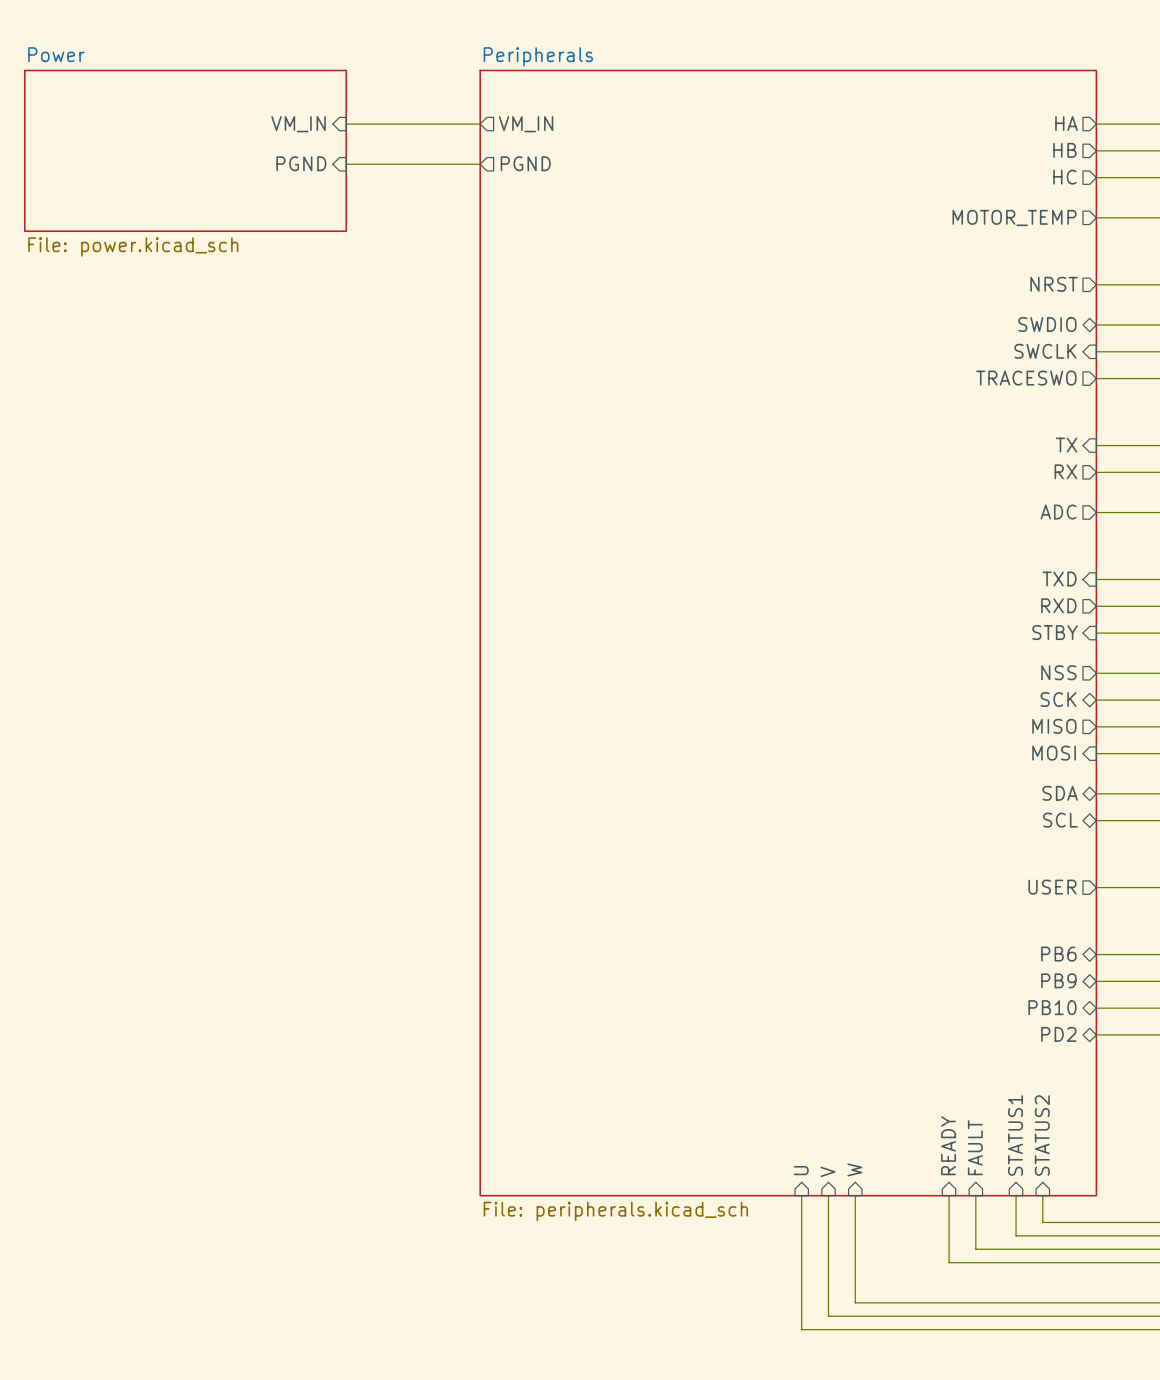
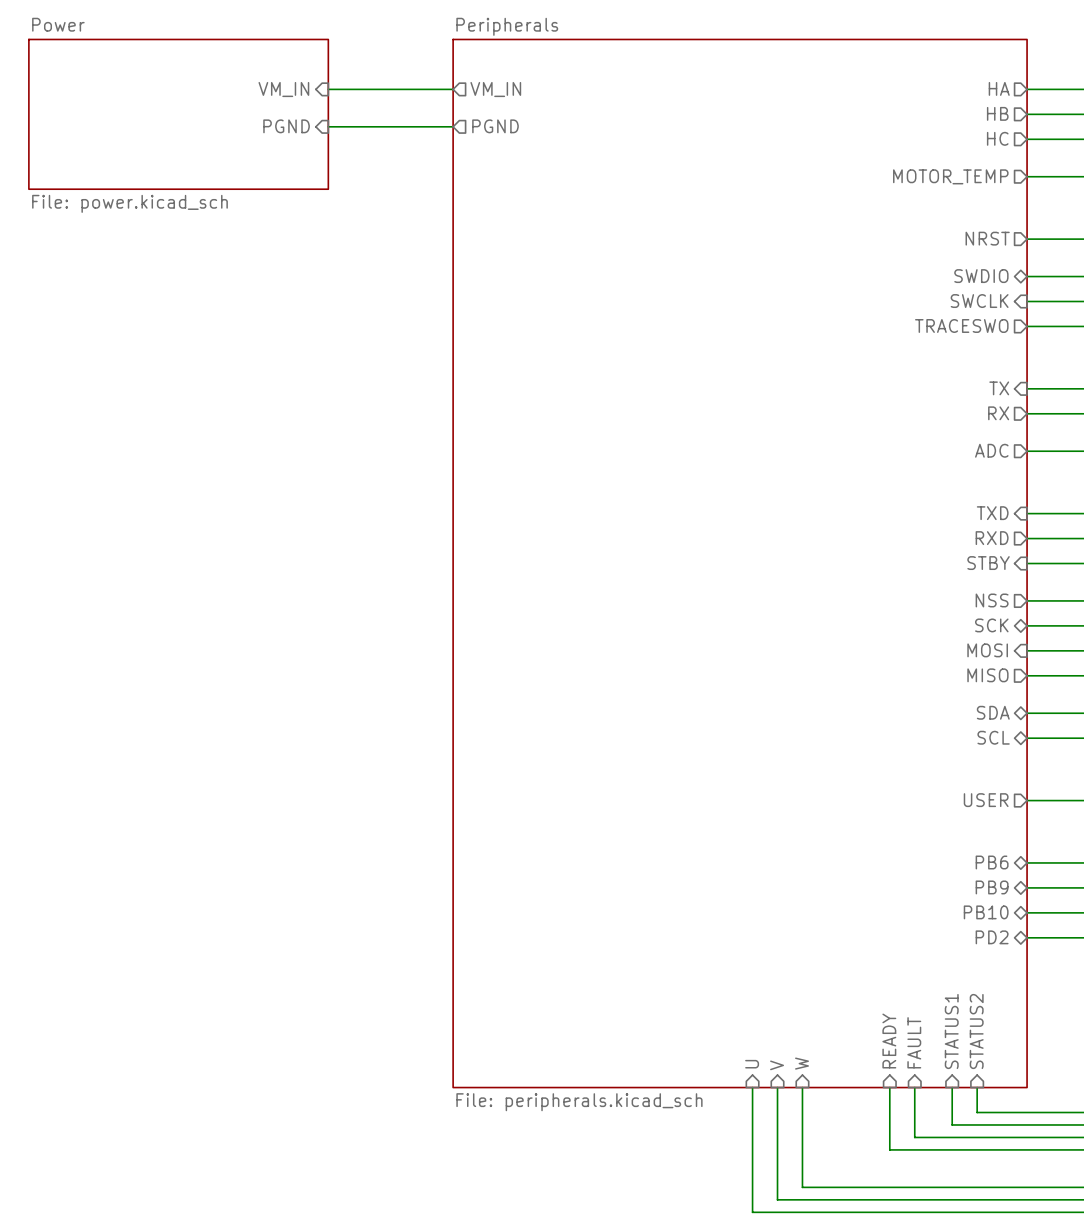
sheet pin shape: output (1054, 726) -> input (987, 650)
sheet pin: MISO (1054, 726) -> MOSI (987, 650)
sheet pin shape: input (1054, 753) -> output (987, 675)
sheet pin: MOSI (1054, 753) -> MISO (987, 675)

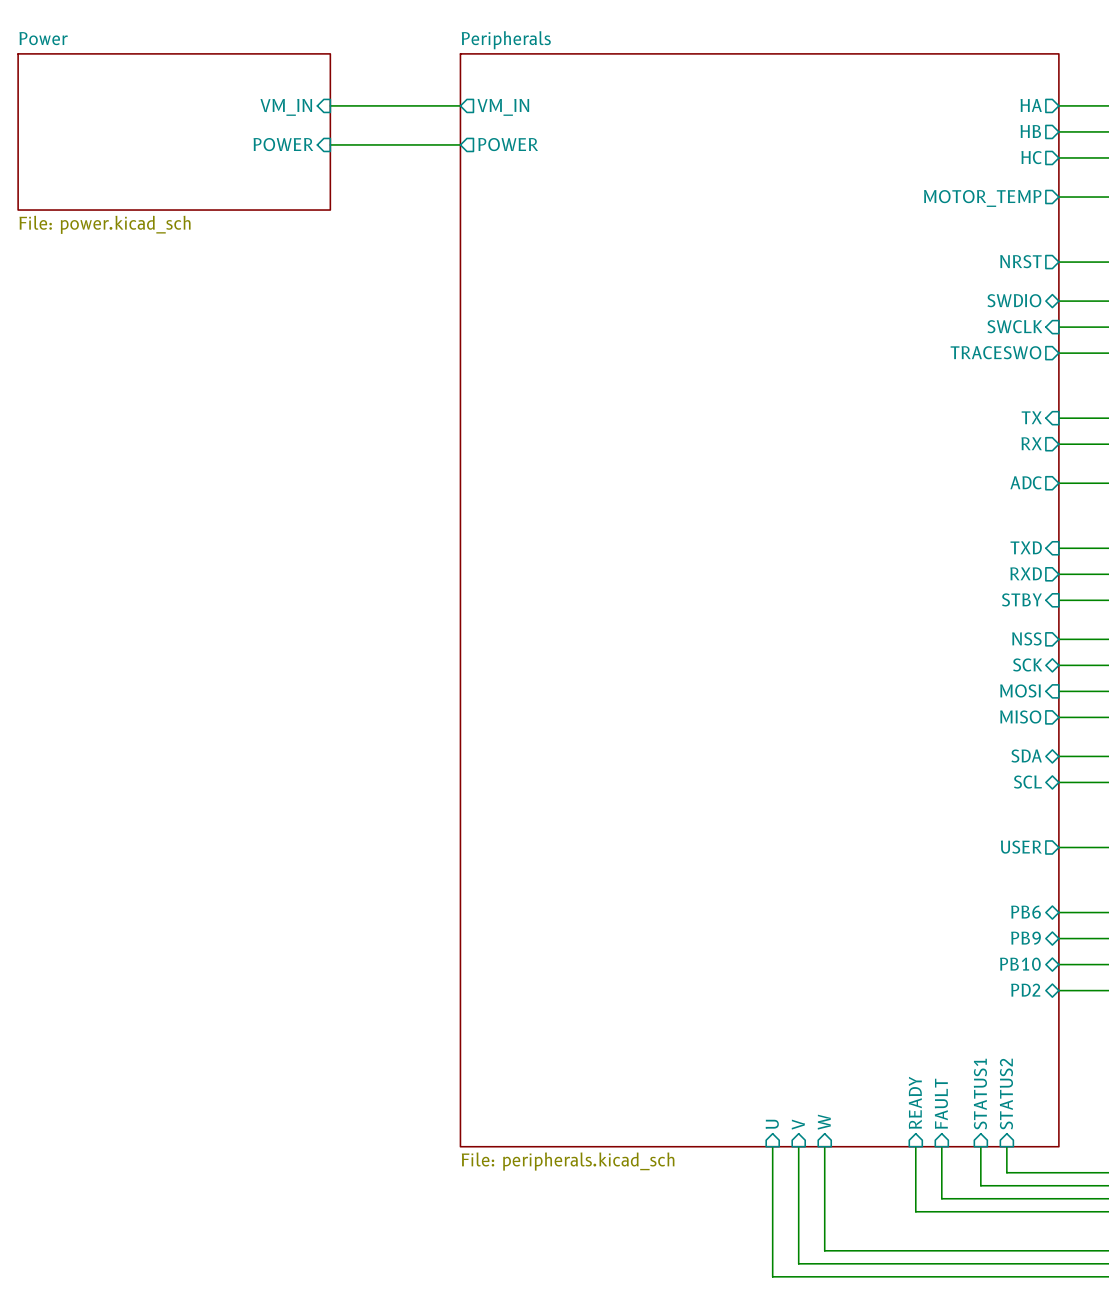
sheet pin: PGND (286, 126) -> POWER (283, 144)
sheet pin: PGND (495, 126) -> POWER (508, 144)

